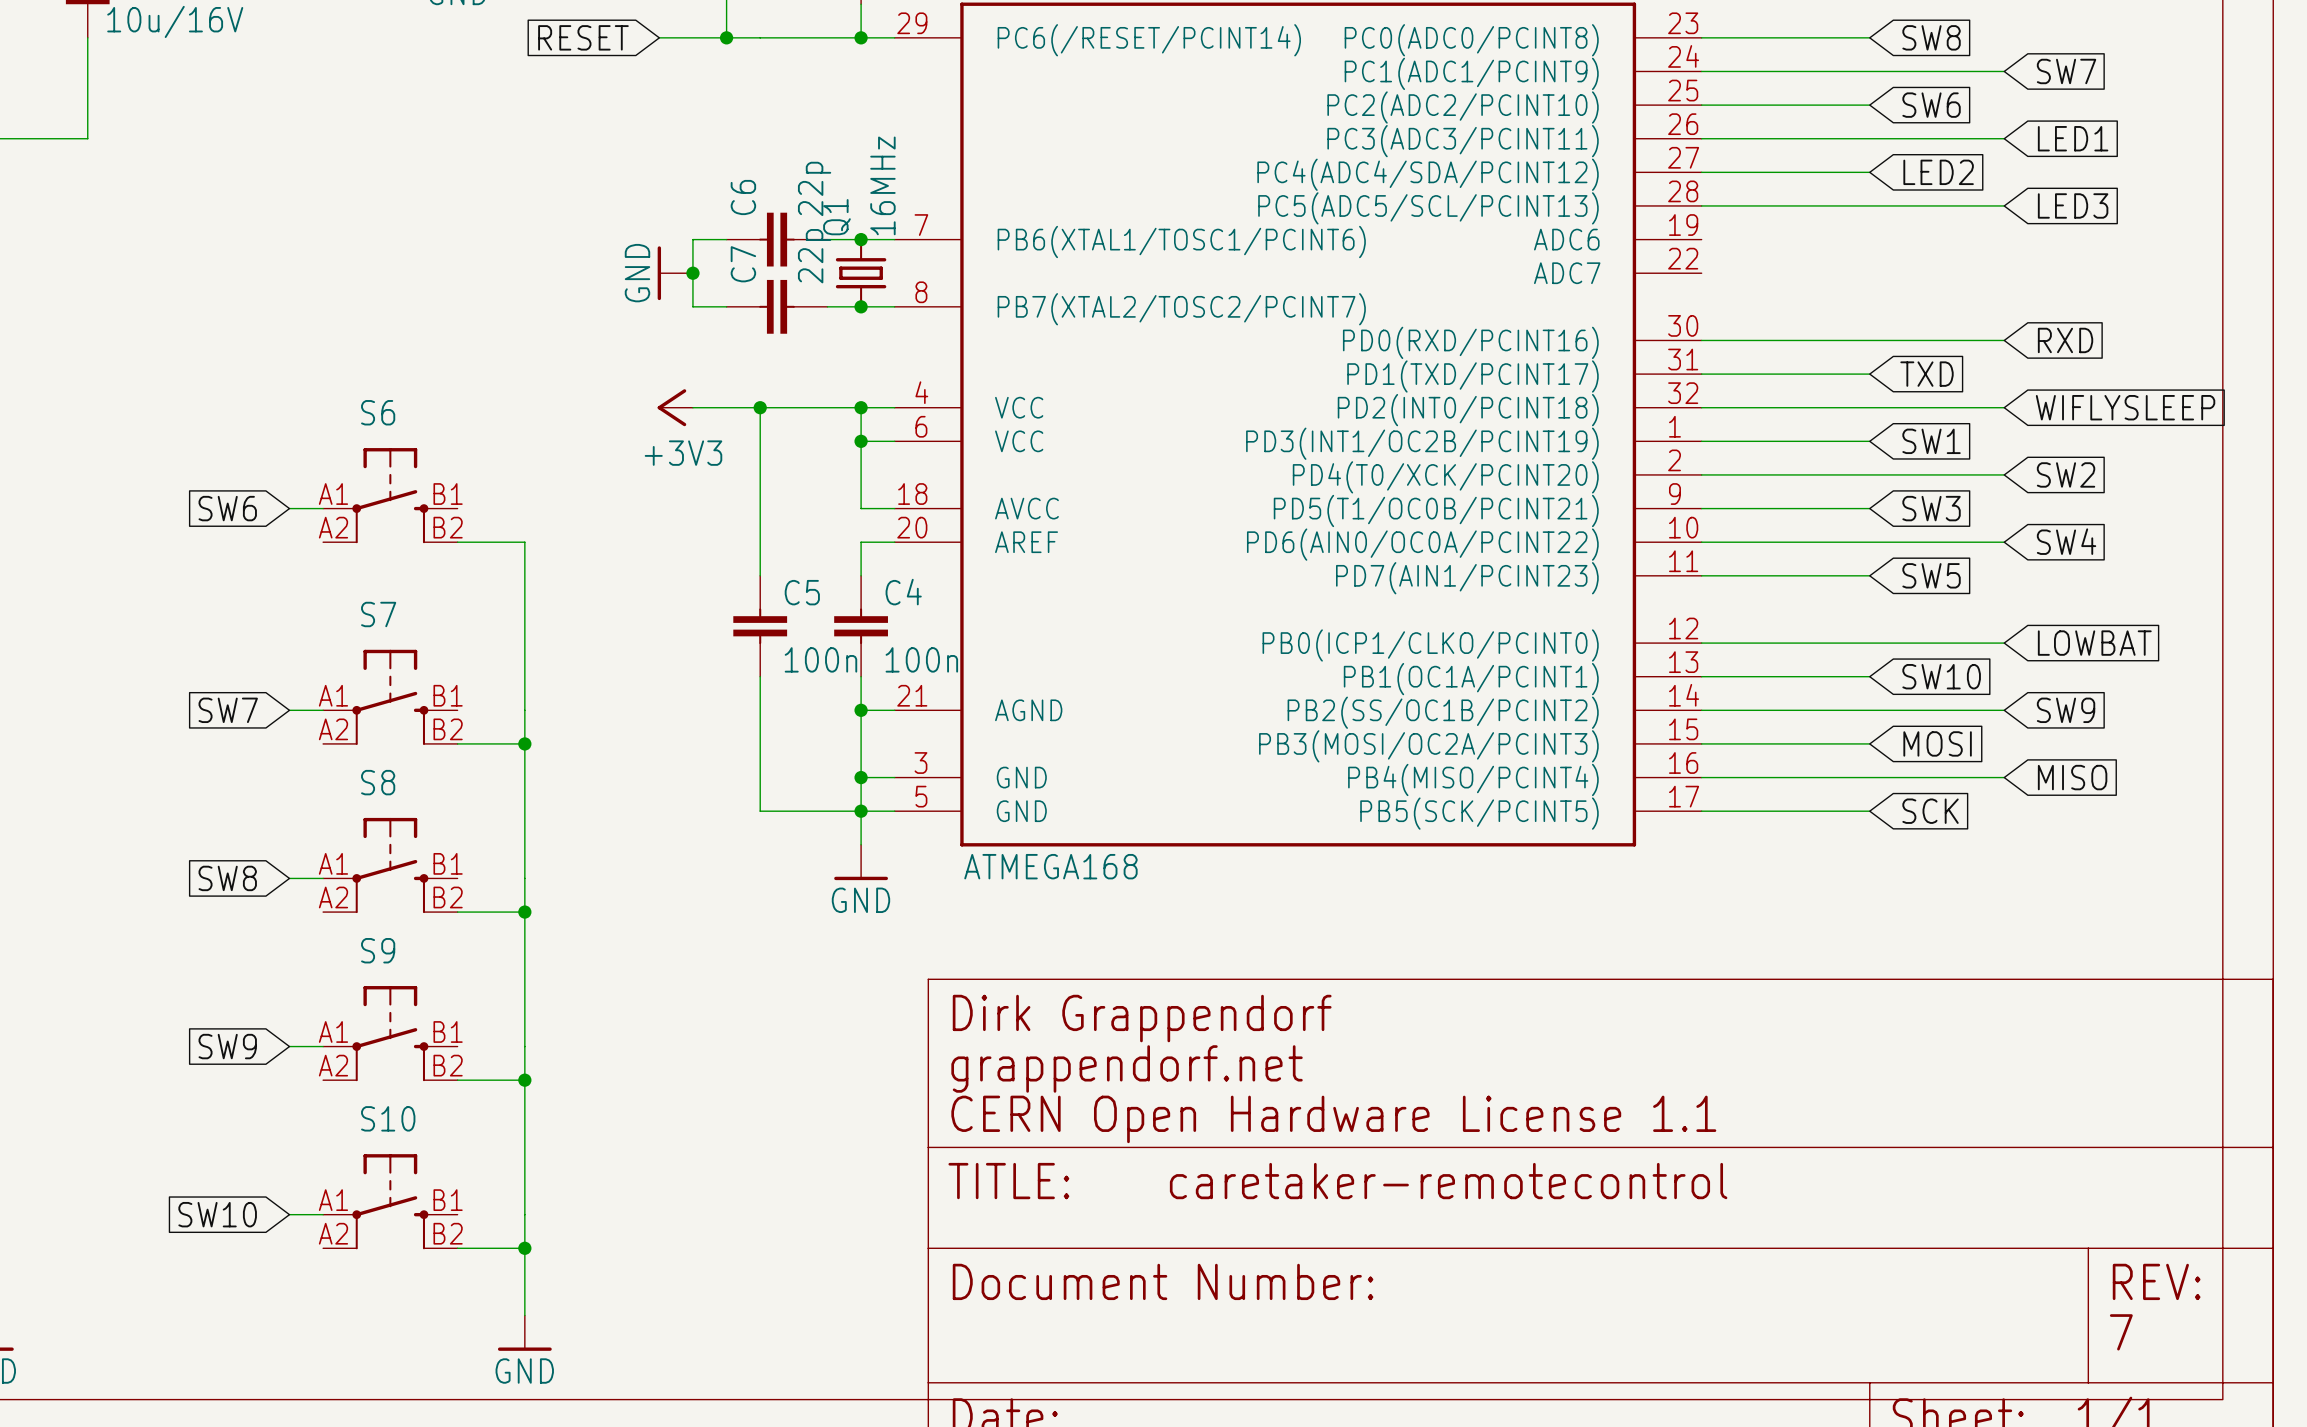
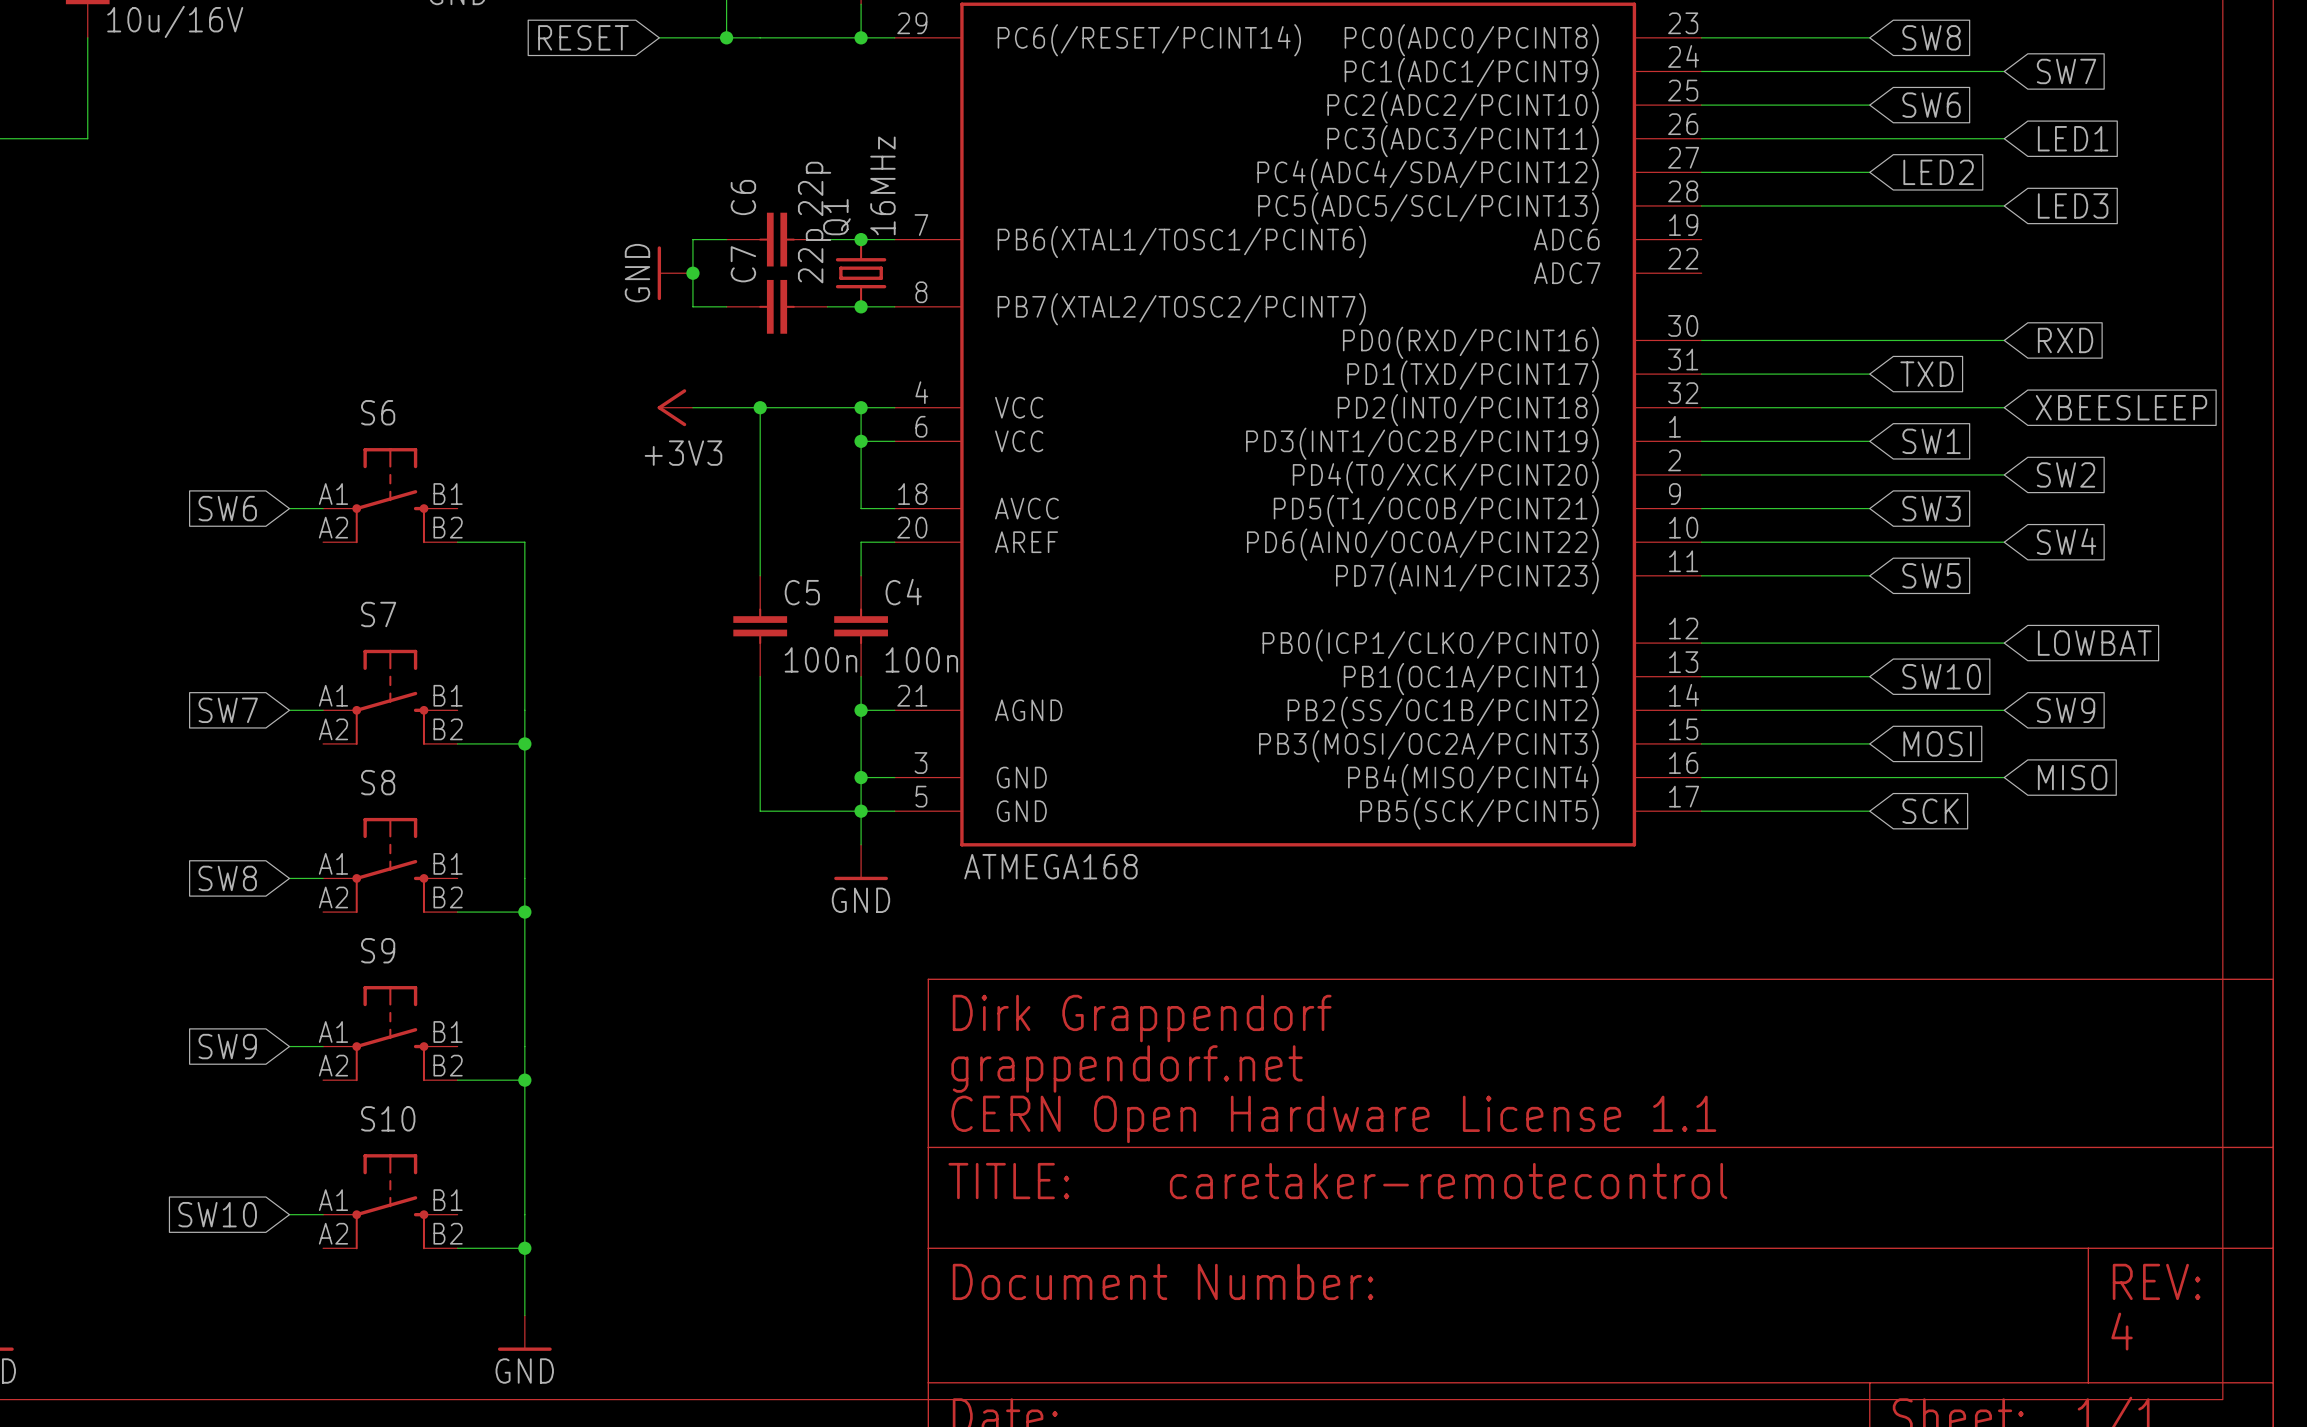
global label: WIFLYSLEEP (2125, 407) -> XBEESLEEP (2121, 407)
text: 7 (2121, 1332) -> 4 (2122, 1331)

